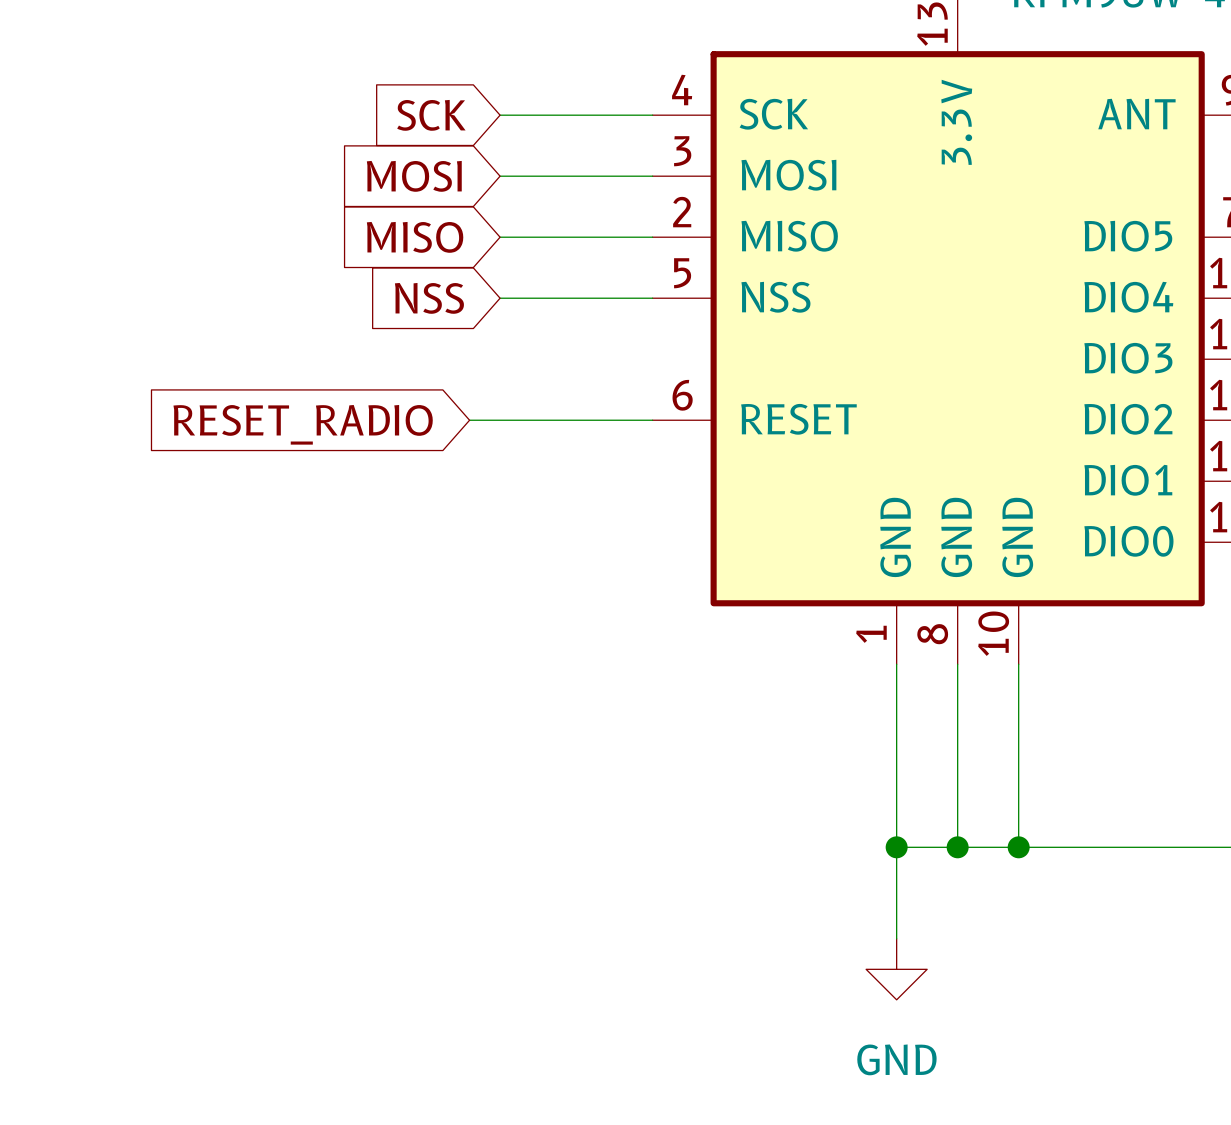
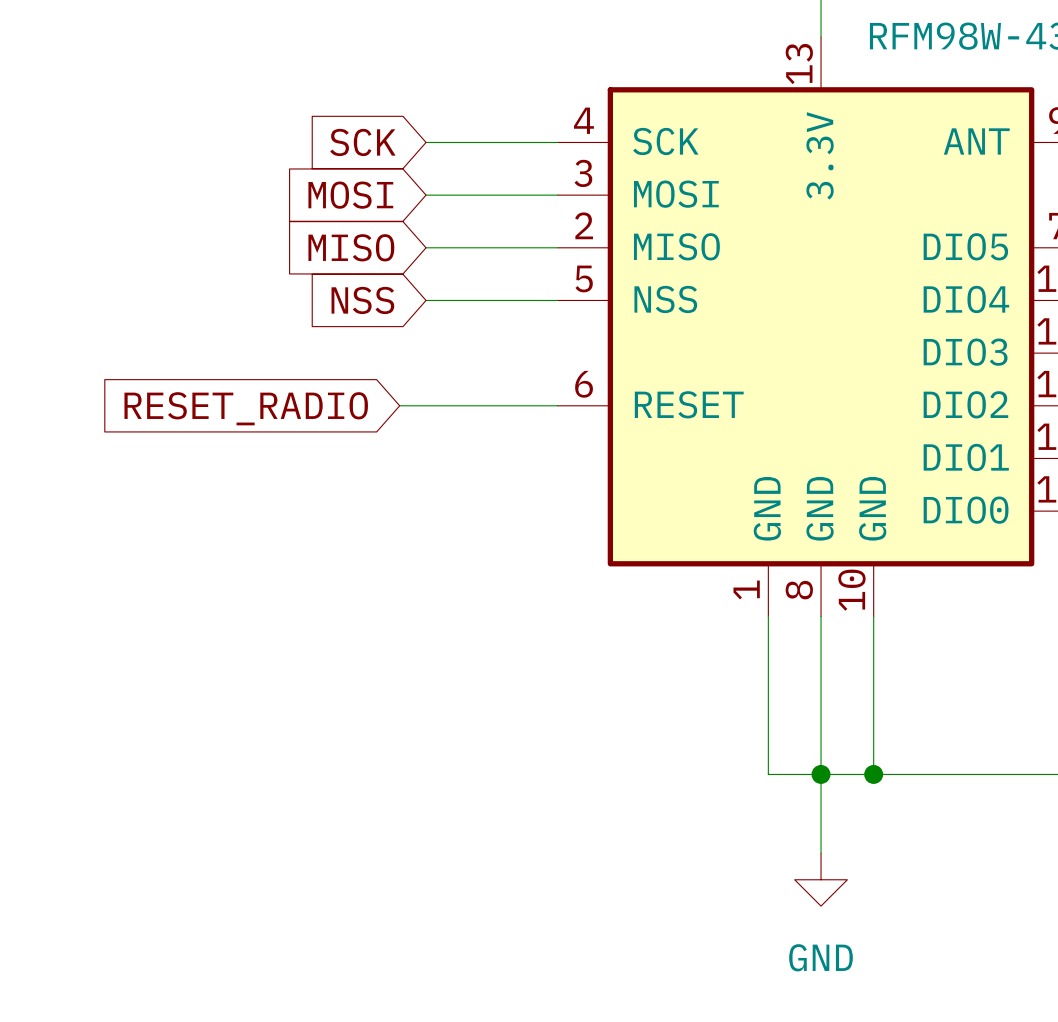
wire: (896, 847) (896, 938) -> (821, 774) (821, 853)
junction: (896, 847) -> none
power symbol position: GND (896, 969) -> GND (821, 879)

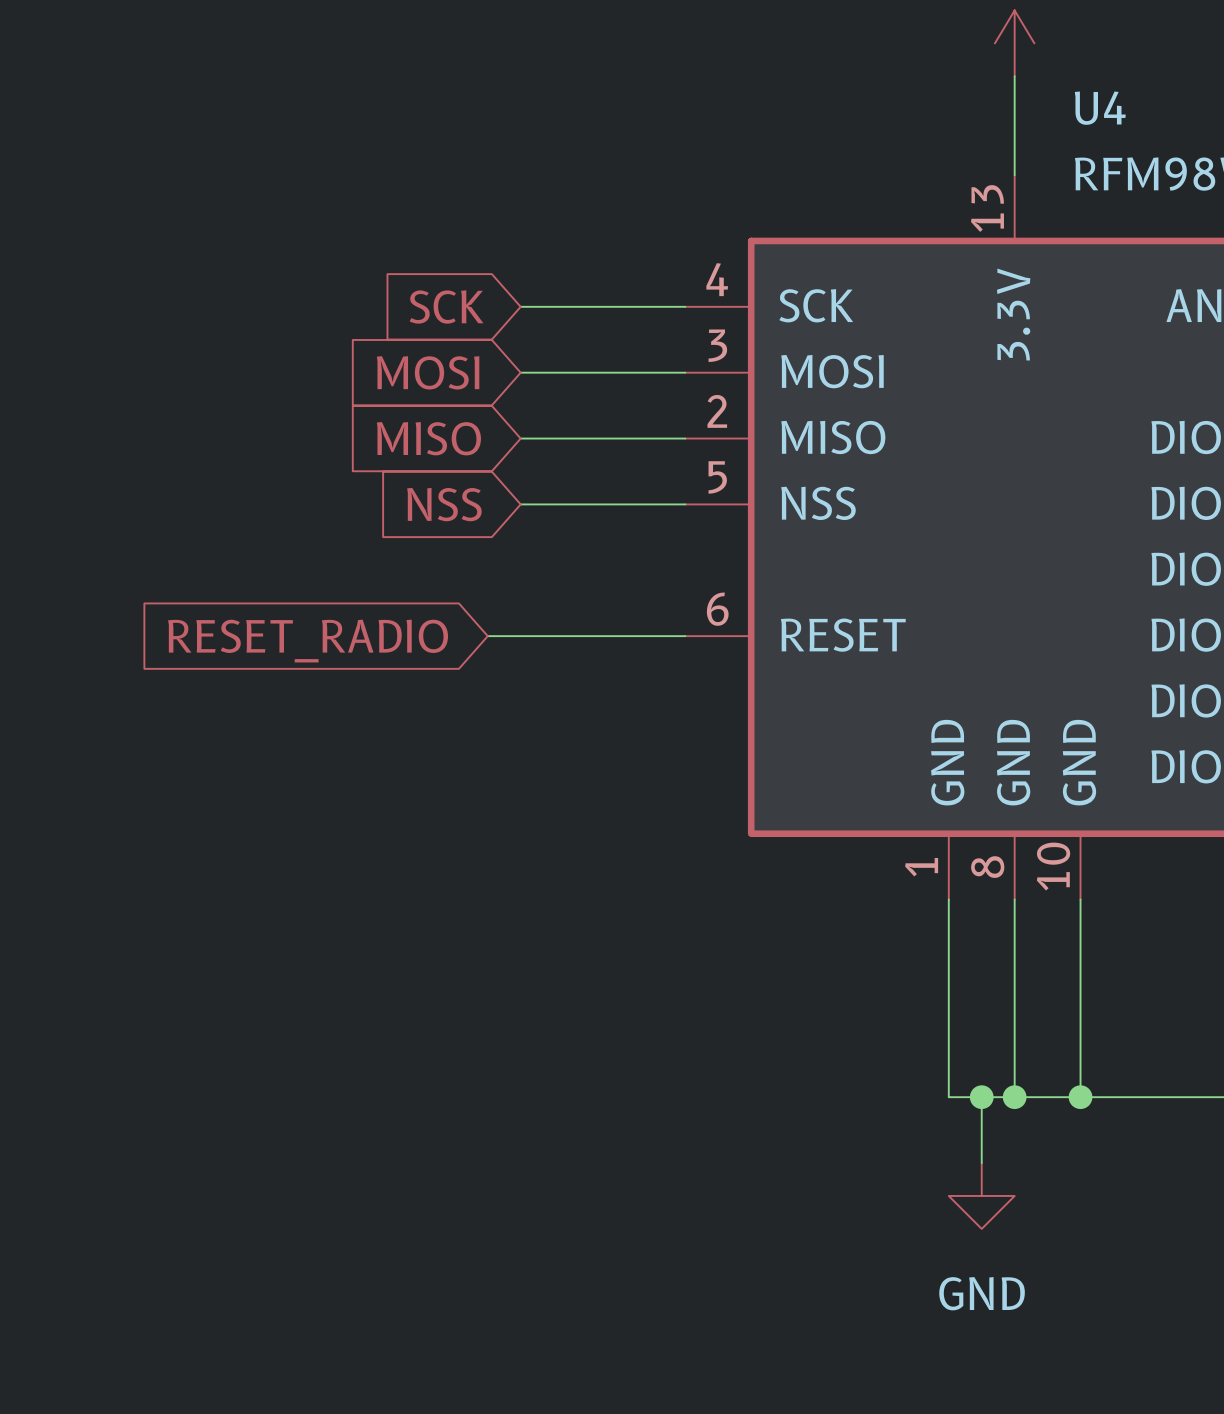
wire: none -> (981, 1097) (981, 1163)
junction: none -> (981, 1097)
wire: (821, 774) (821, 853) -> none
power symbol position: GND (821, 879) -> GND (981, 1195)

